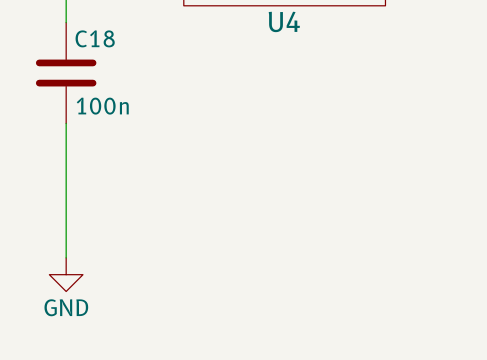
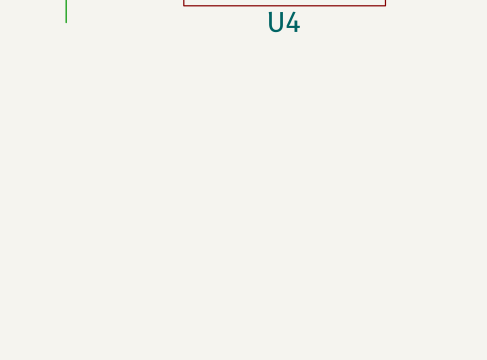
C18: 100n (66, 73) -> none
wire: (66, 123) (66, 257) -> none
power symbol: GND (66, 274) -> none

